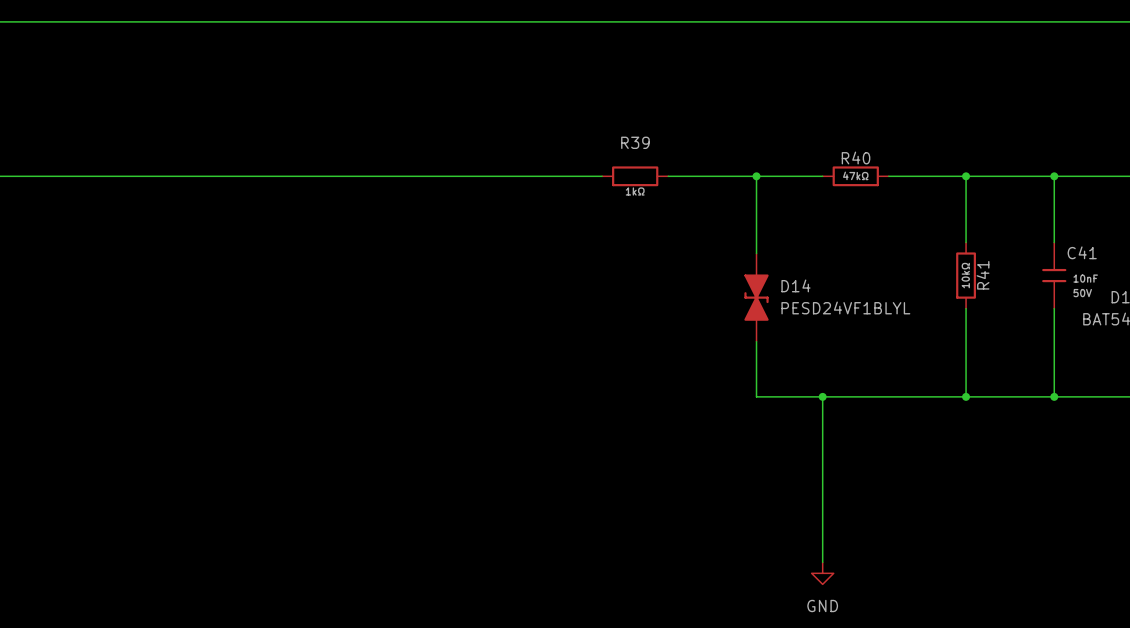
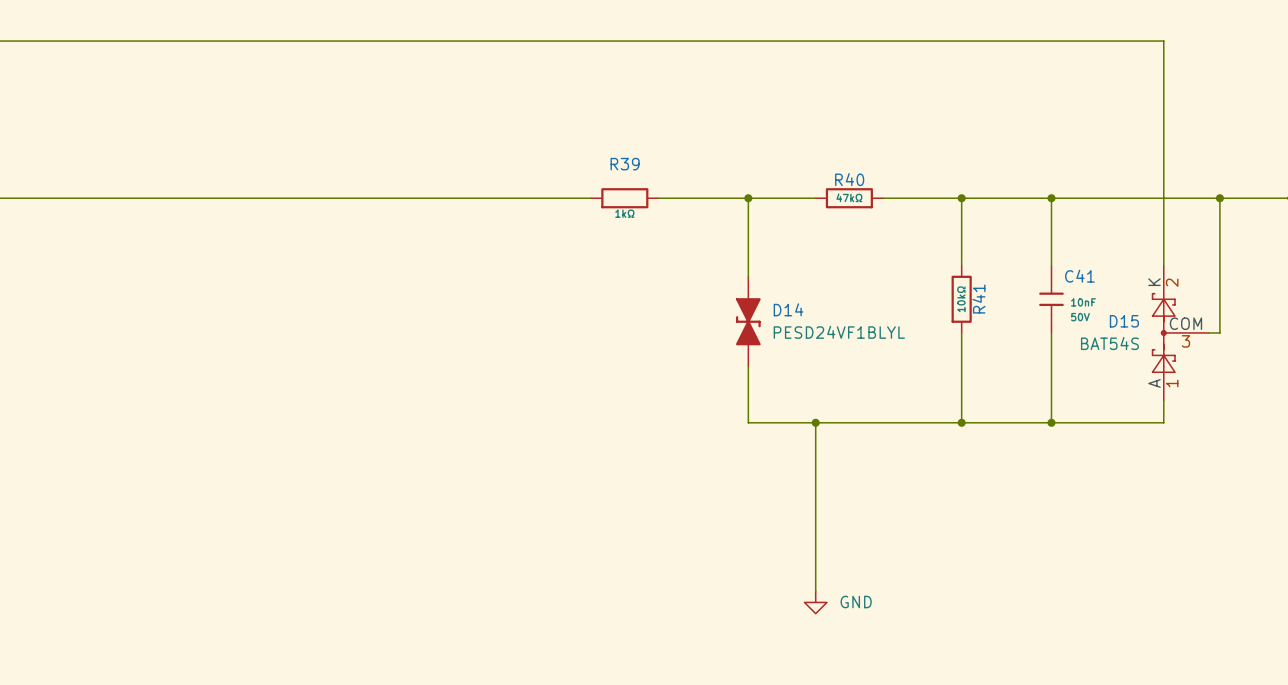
power symbol text position: GND (822, 606) -> GND (856, 602)

